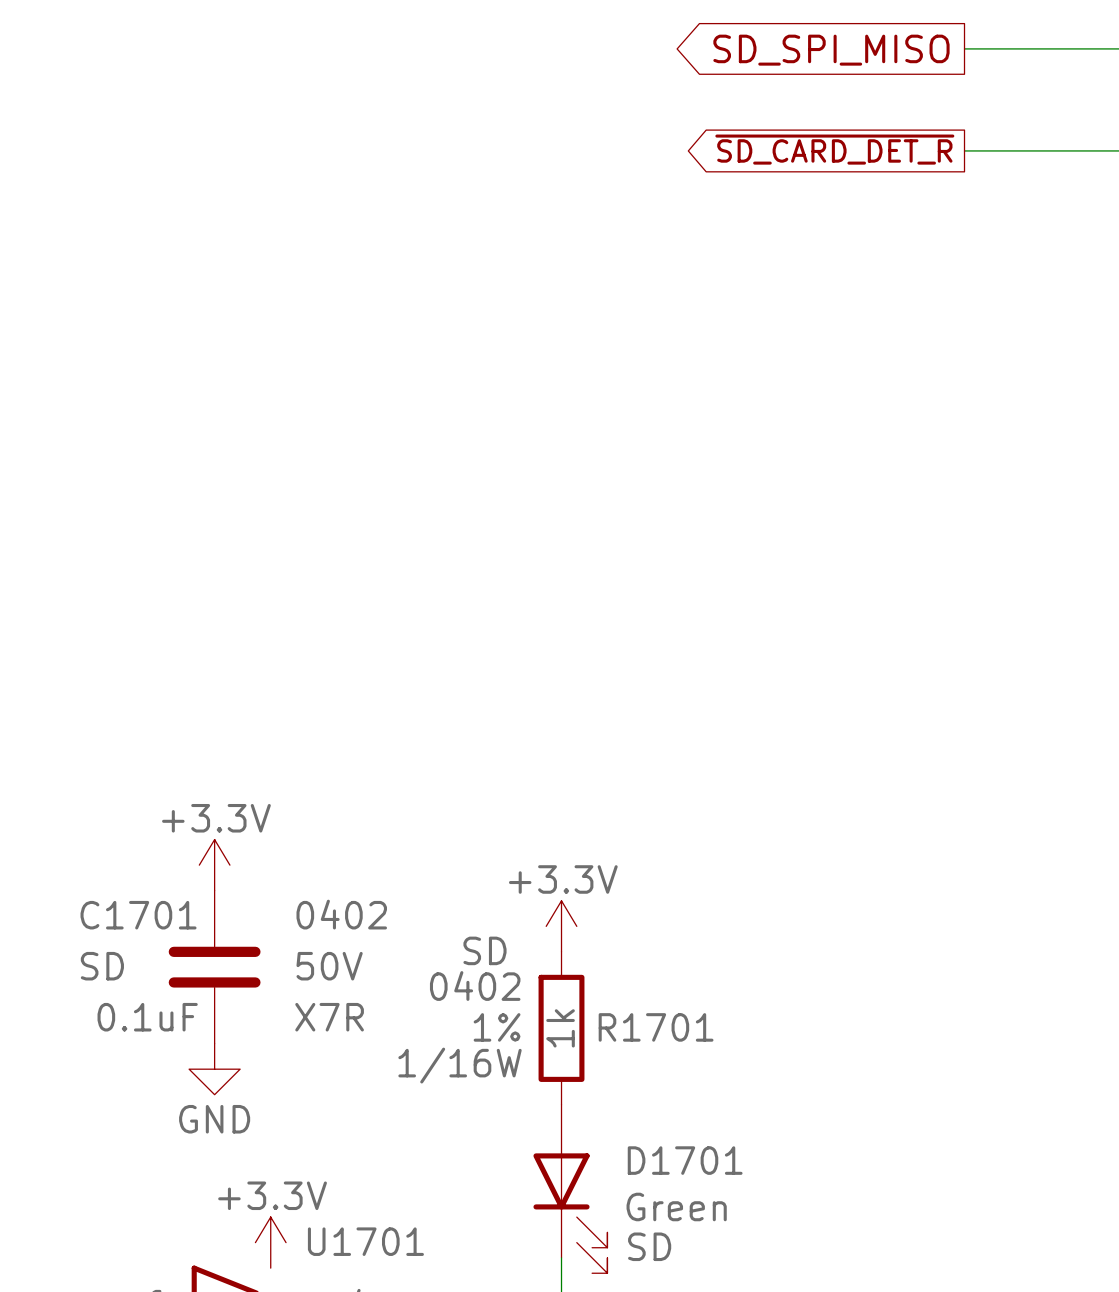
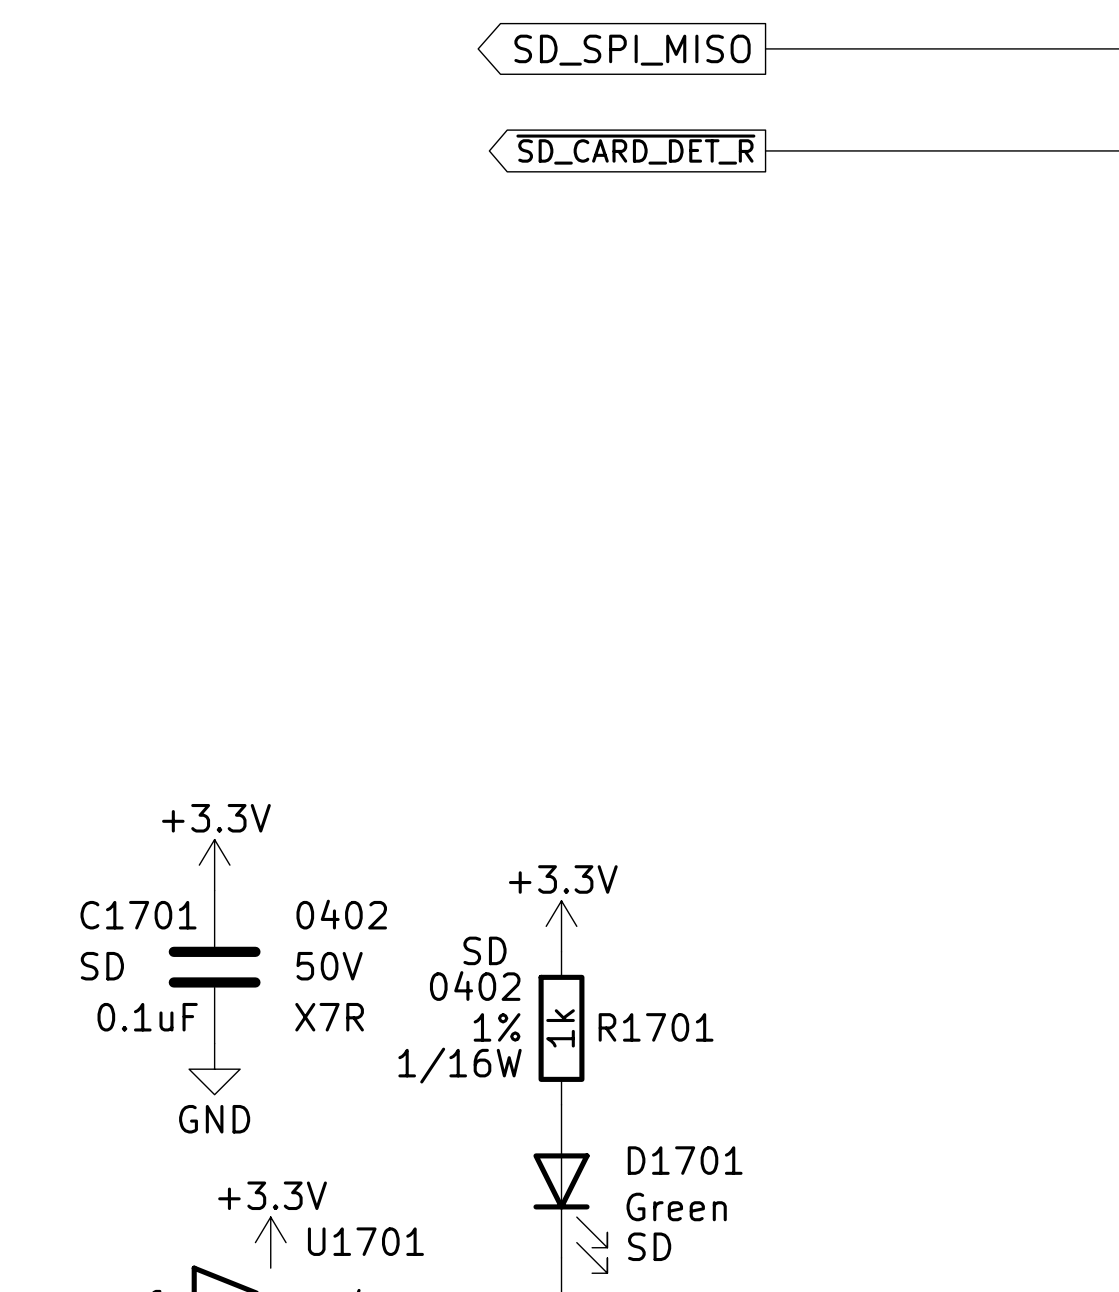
wire: none -> (765, 48) (964, 48)
global label position: SD_SPI_MISO (831, 50) -> SD_SPI_MISO (632, 50)
global label position: ~{SD_CARD_DET_R} (834, 149) -> ~{SD_CARD_DET_R} (635, 149)
wire: none -> (765, 150) (964, 150)

